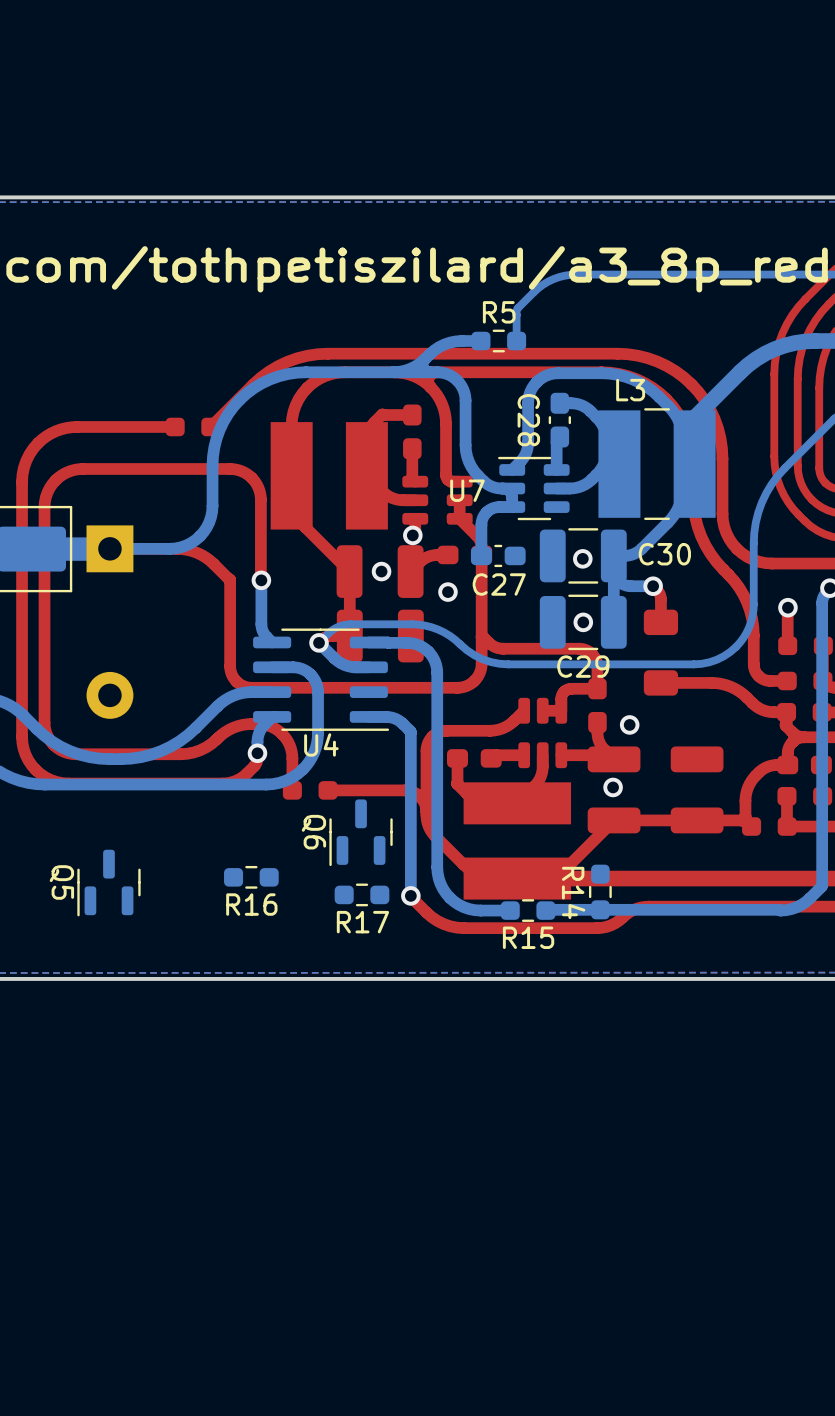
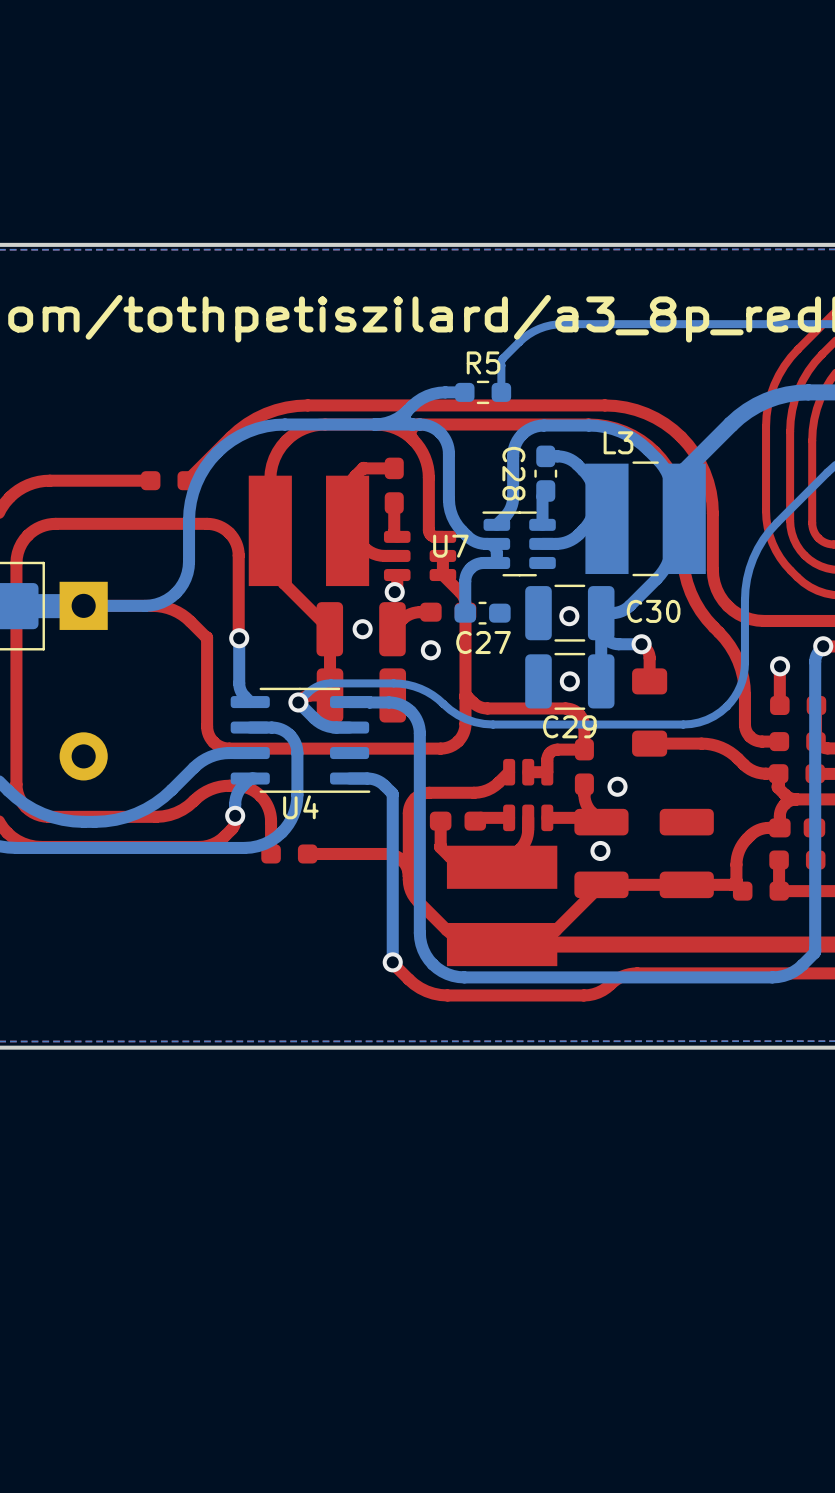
Q6: (361, 832) -> none
R16: (251, 877) -> none
Q5: (108, 883) -> none
R14: (600, 892) -> none
R17: (362, 894) -> none
R15: (528, 910) -> none
bottom track: (780, 910) (545, 910) -> (772, 977) (494, 977)

